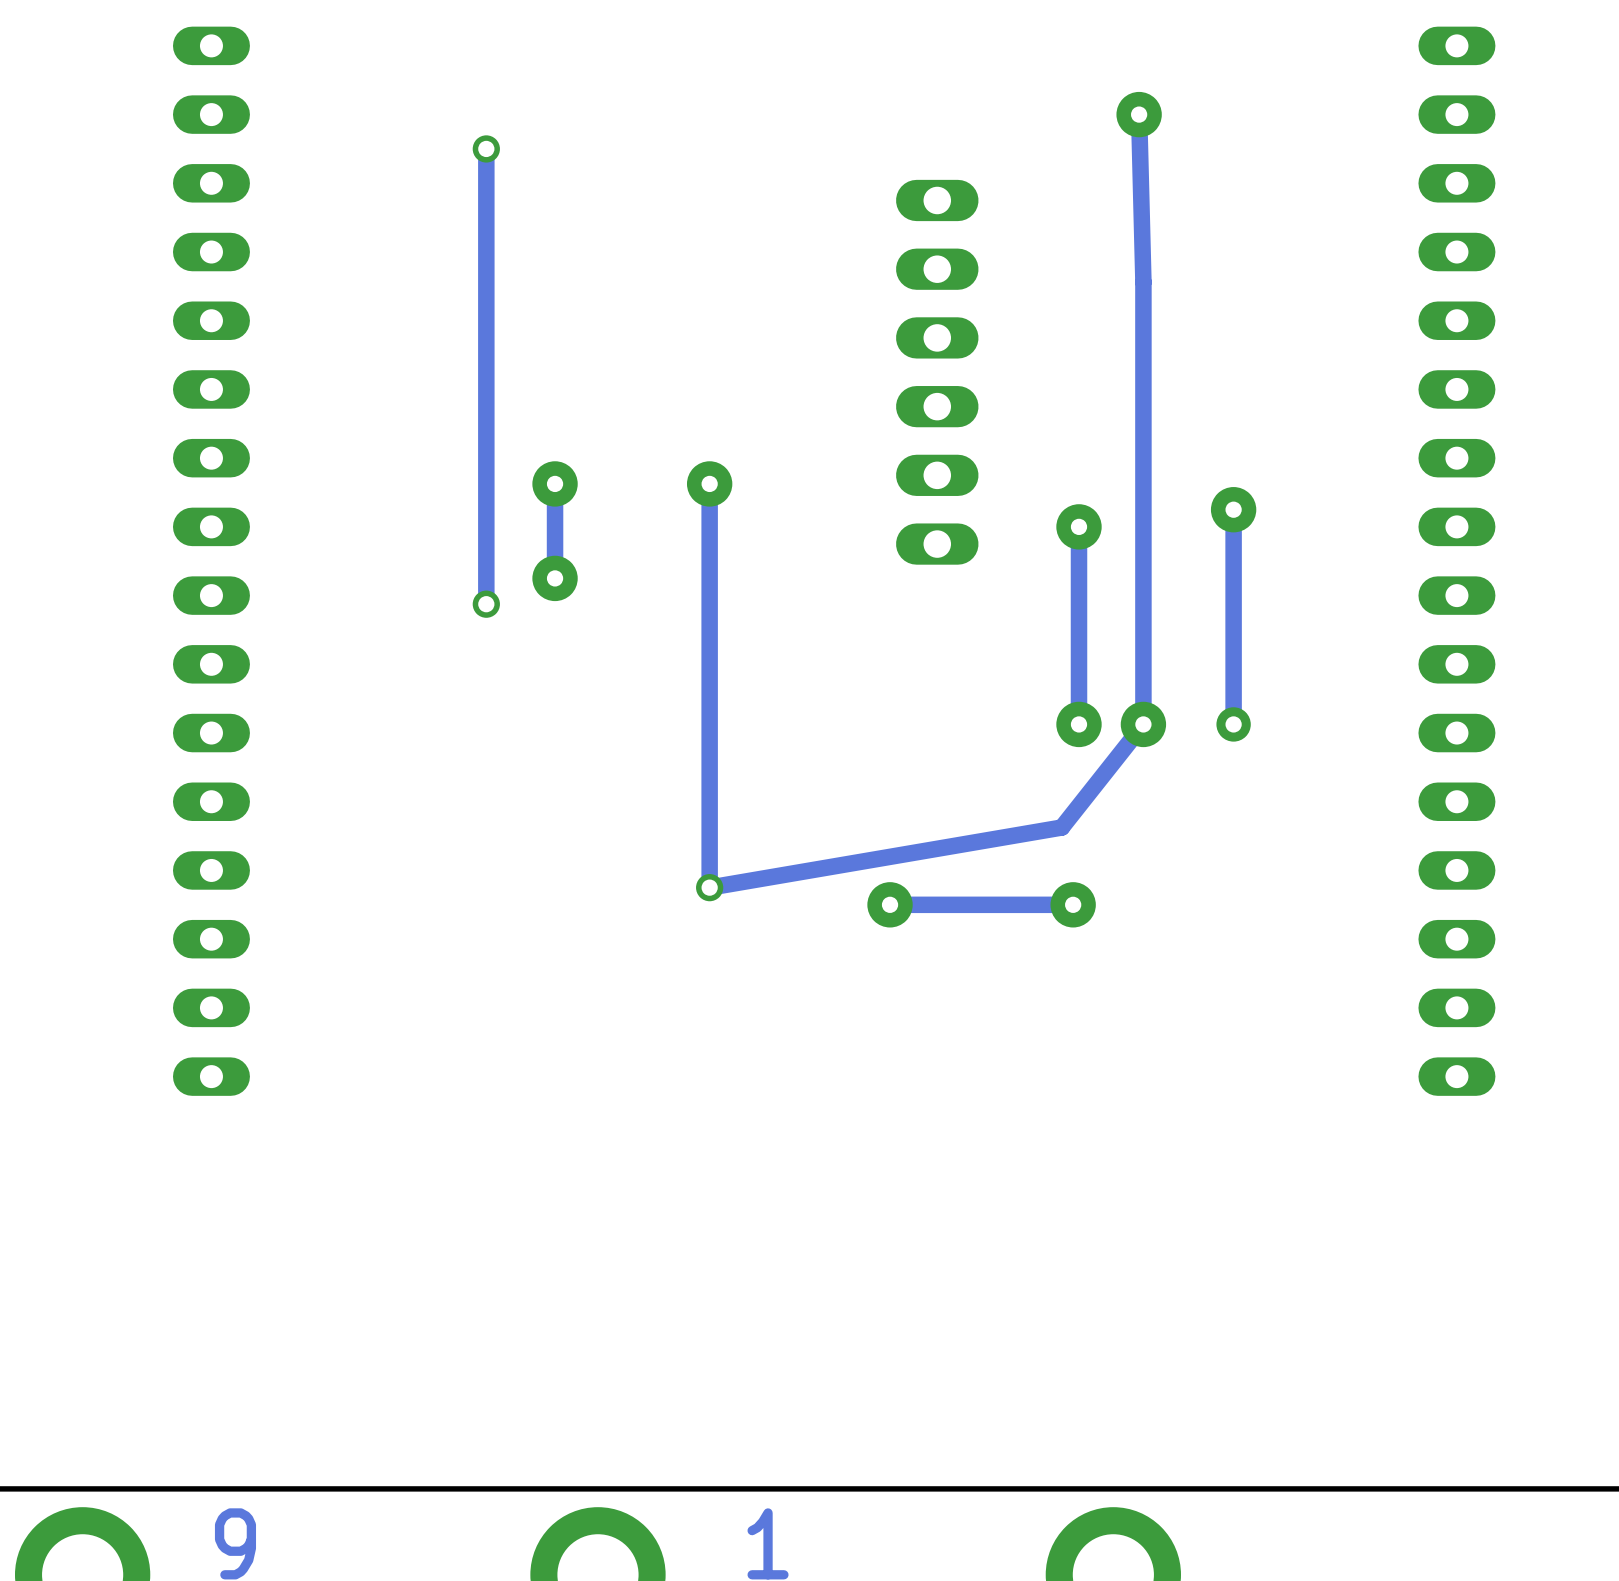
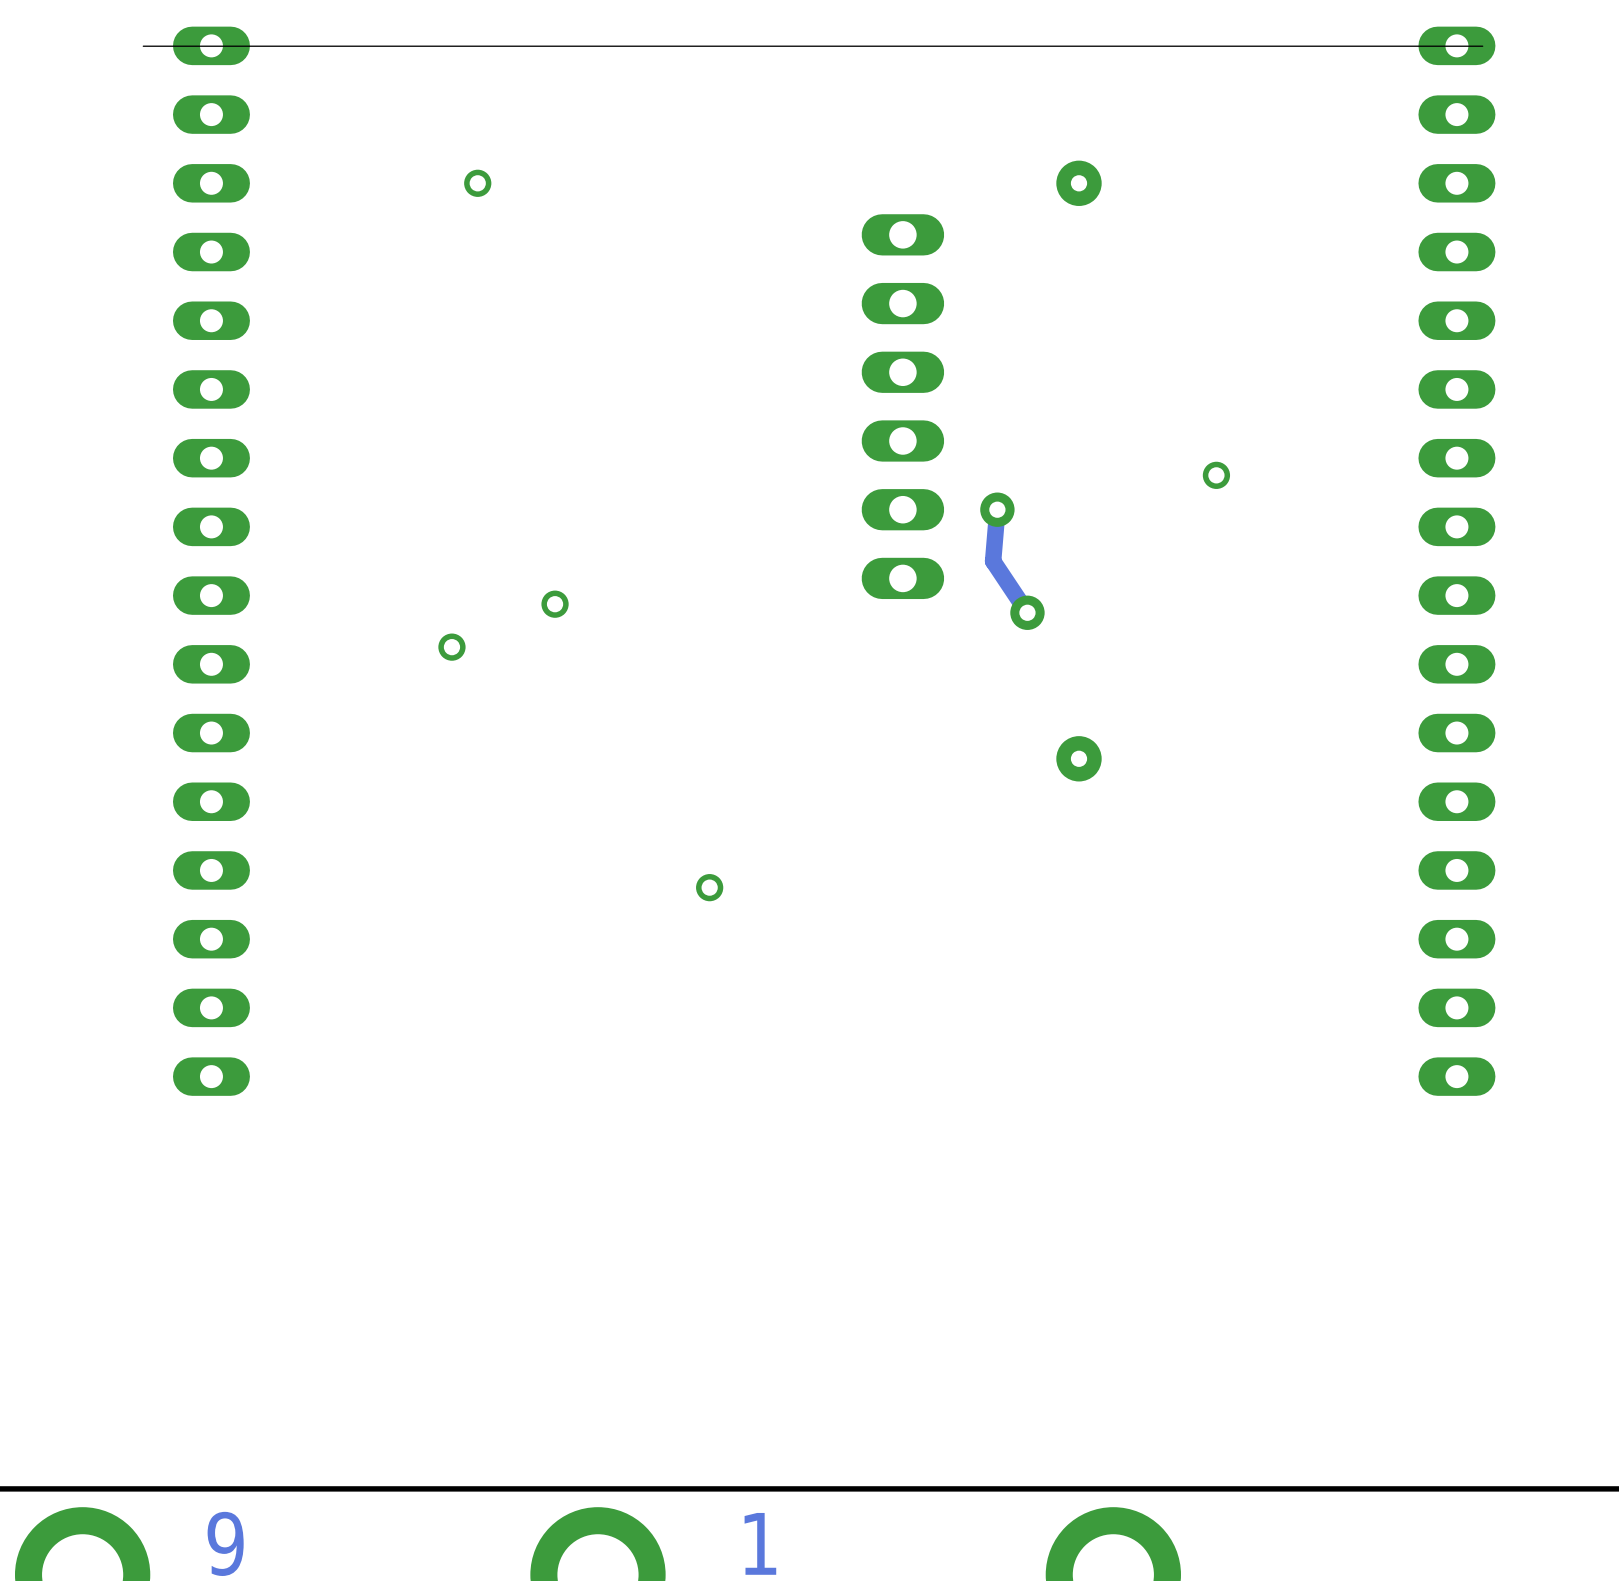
board edge: none -> (1482, 46) (143, 46)
track: (1139, 114) (1143, 282) (1143, 724) (1061, 827) (709, 887) (709, 483) -> none
via position: (1139, 114) -> (1079, 183)
track: (486, 148) (486, 604) -> none
via position: (486, 148) -> (477, 183)
part position: (937, 372) -> (902, 406)
via: none -> (1216, 475)
track: (555, 483) (555, 578) -> none
via: (555, 483) -> none
via: (709, 483) -> none
track: none -> (997, 509) (993, 561) (1027, 612)
via: none -> (997, 509)
track: (1233, 509) (1233, 724) -> none
via: (1233, 509) -> none
track: (1079, 526) (1079, 724) -> none
via: (1079, 526) -> none
via size: [532, 555, 578, 602] -> [541, 590, 569, 618]
via: (486, 604) -> none
via: none -> (1027, 612)
via: none -> (451, 647)
via position: (1079, 724) -> (1079, 758)
via: (1143, 724) -> none
via: (1233, 724) -> none
via: (890, 904) -> none
track: (1073, 904) (890, 904) -> none
via: (1073, 904) -> none

